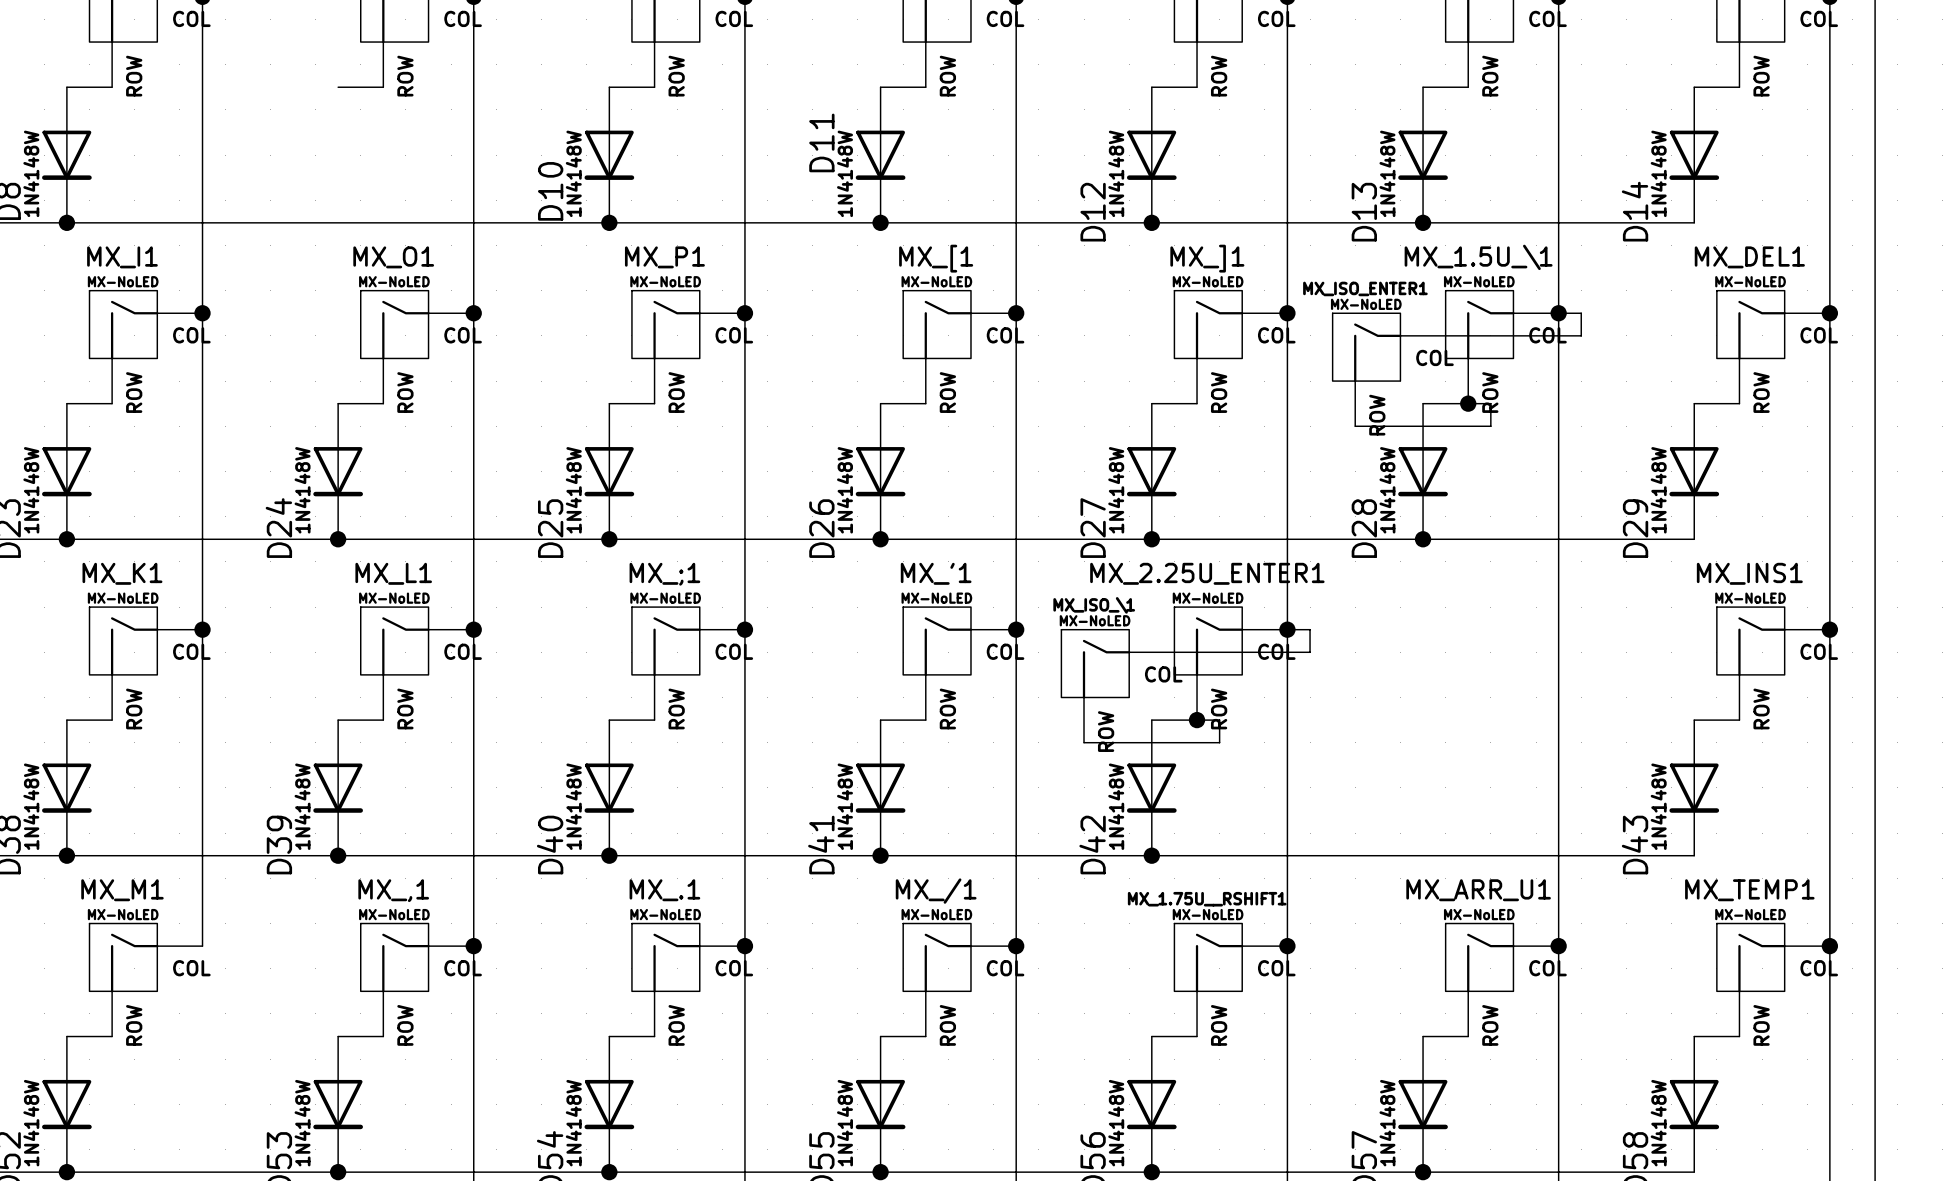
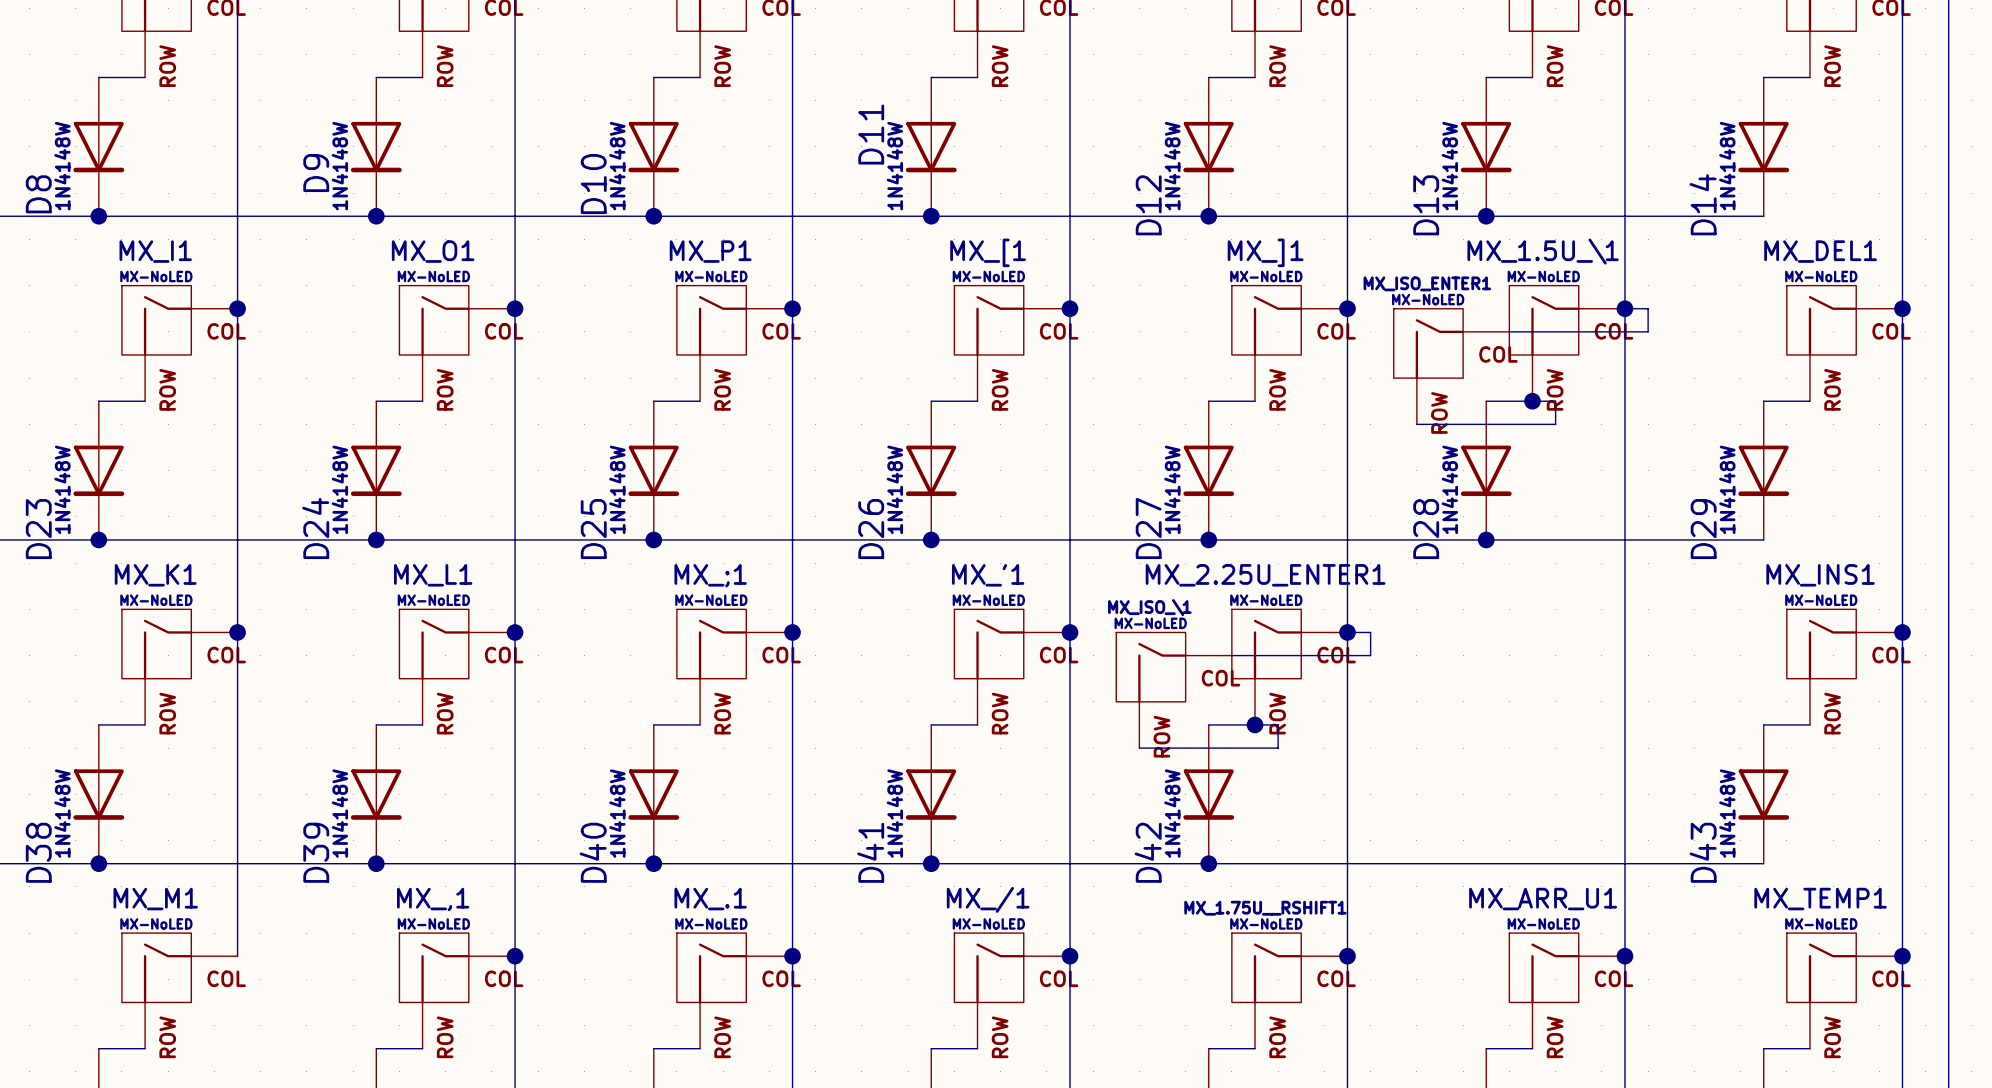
D9: none -> 1N4148W (376, 146)
junction: none -> (376, 216)

